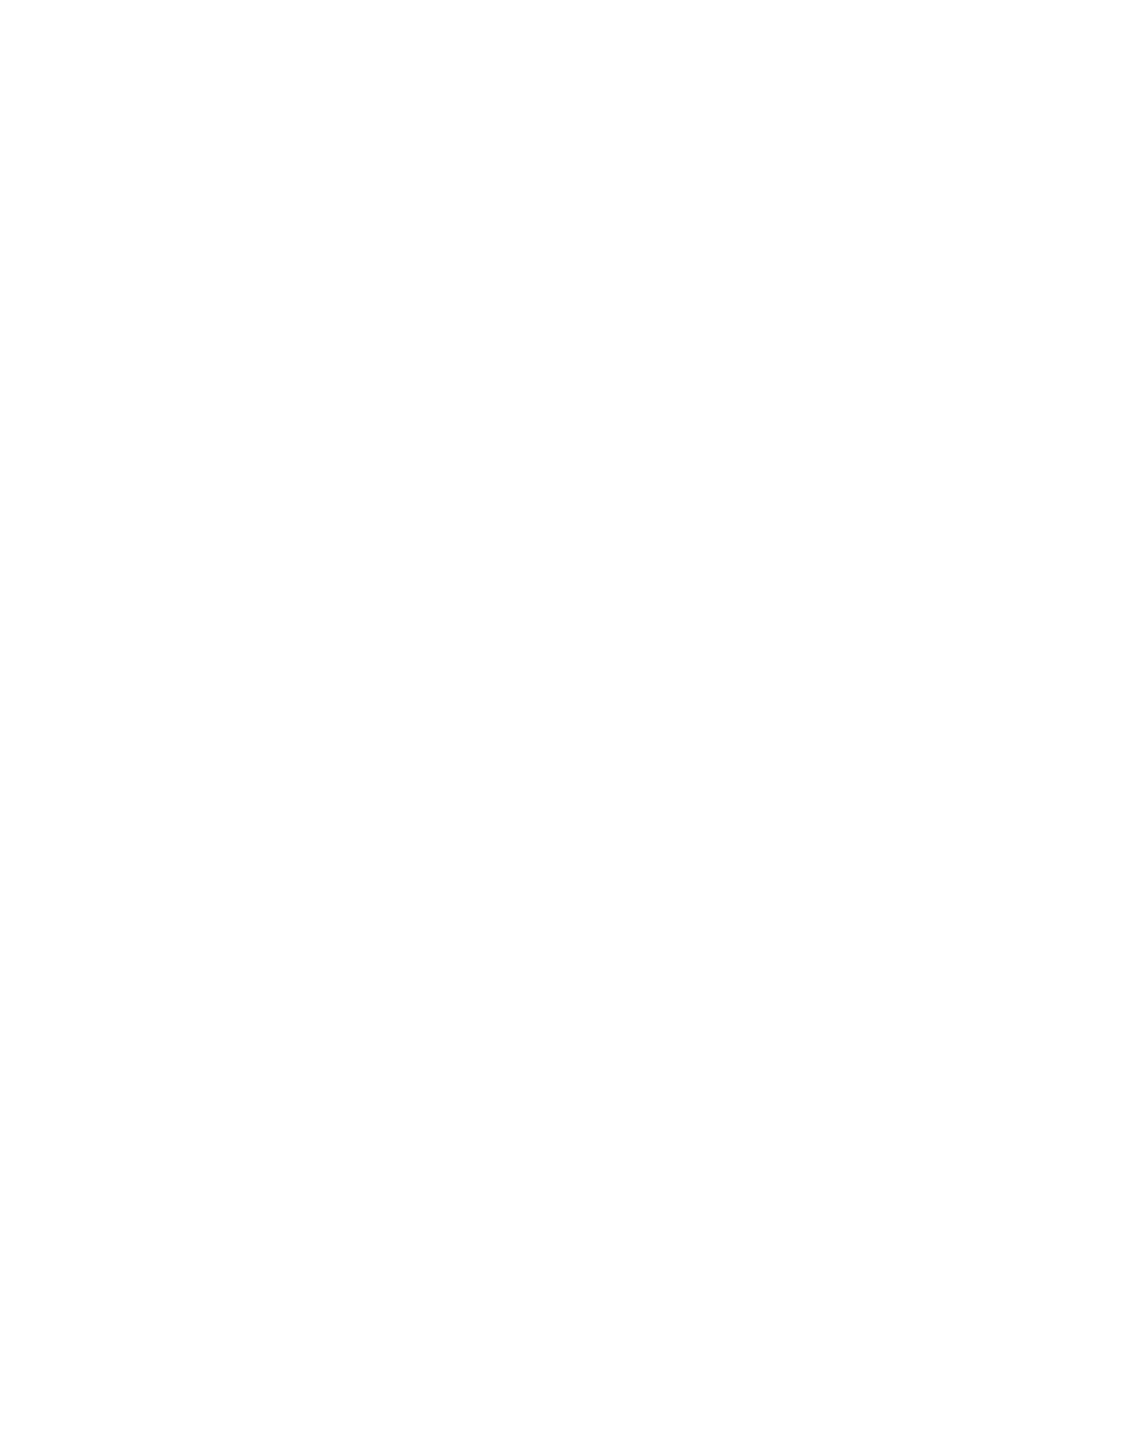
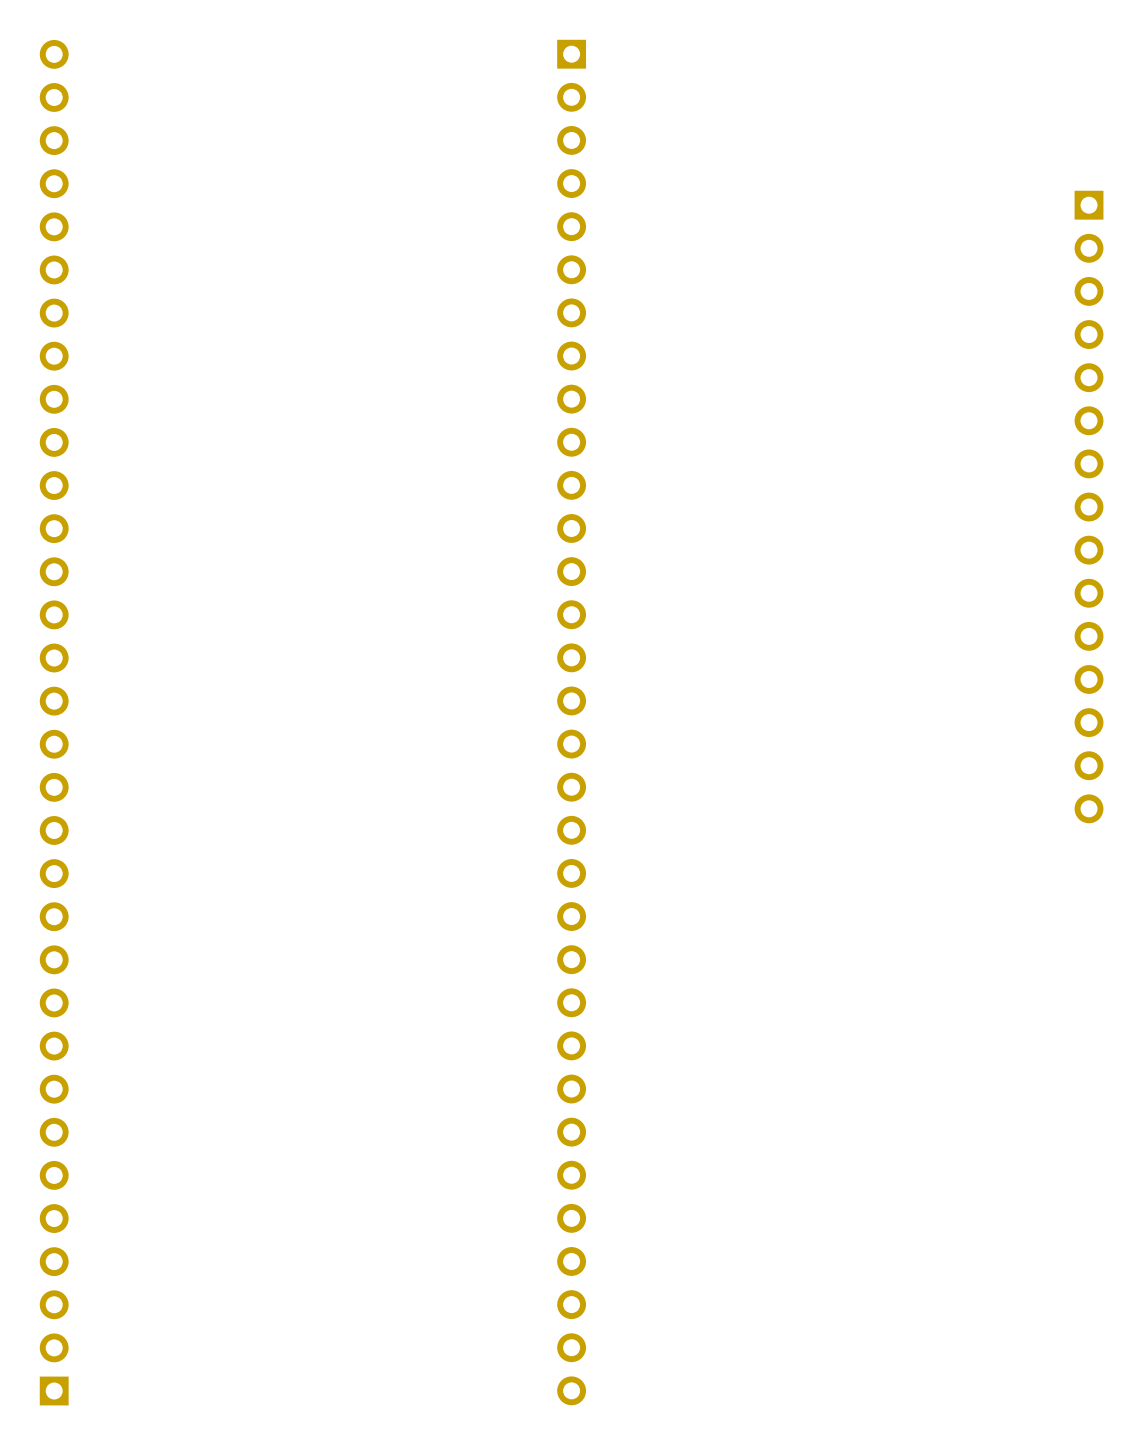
part: none -> (1089, 507)
part: none -> (54, 722)
part: none -> (571, 722)

